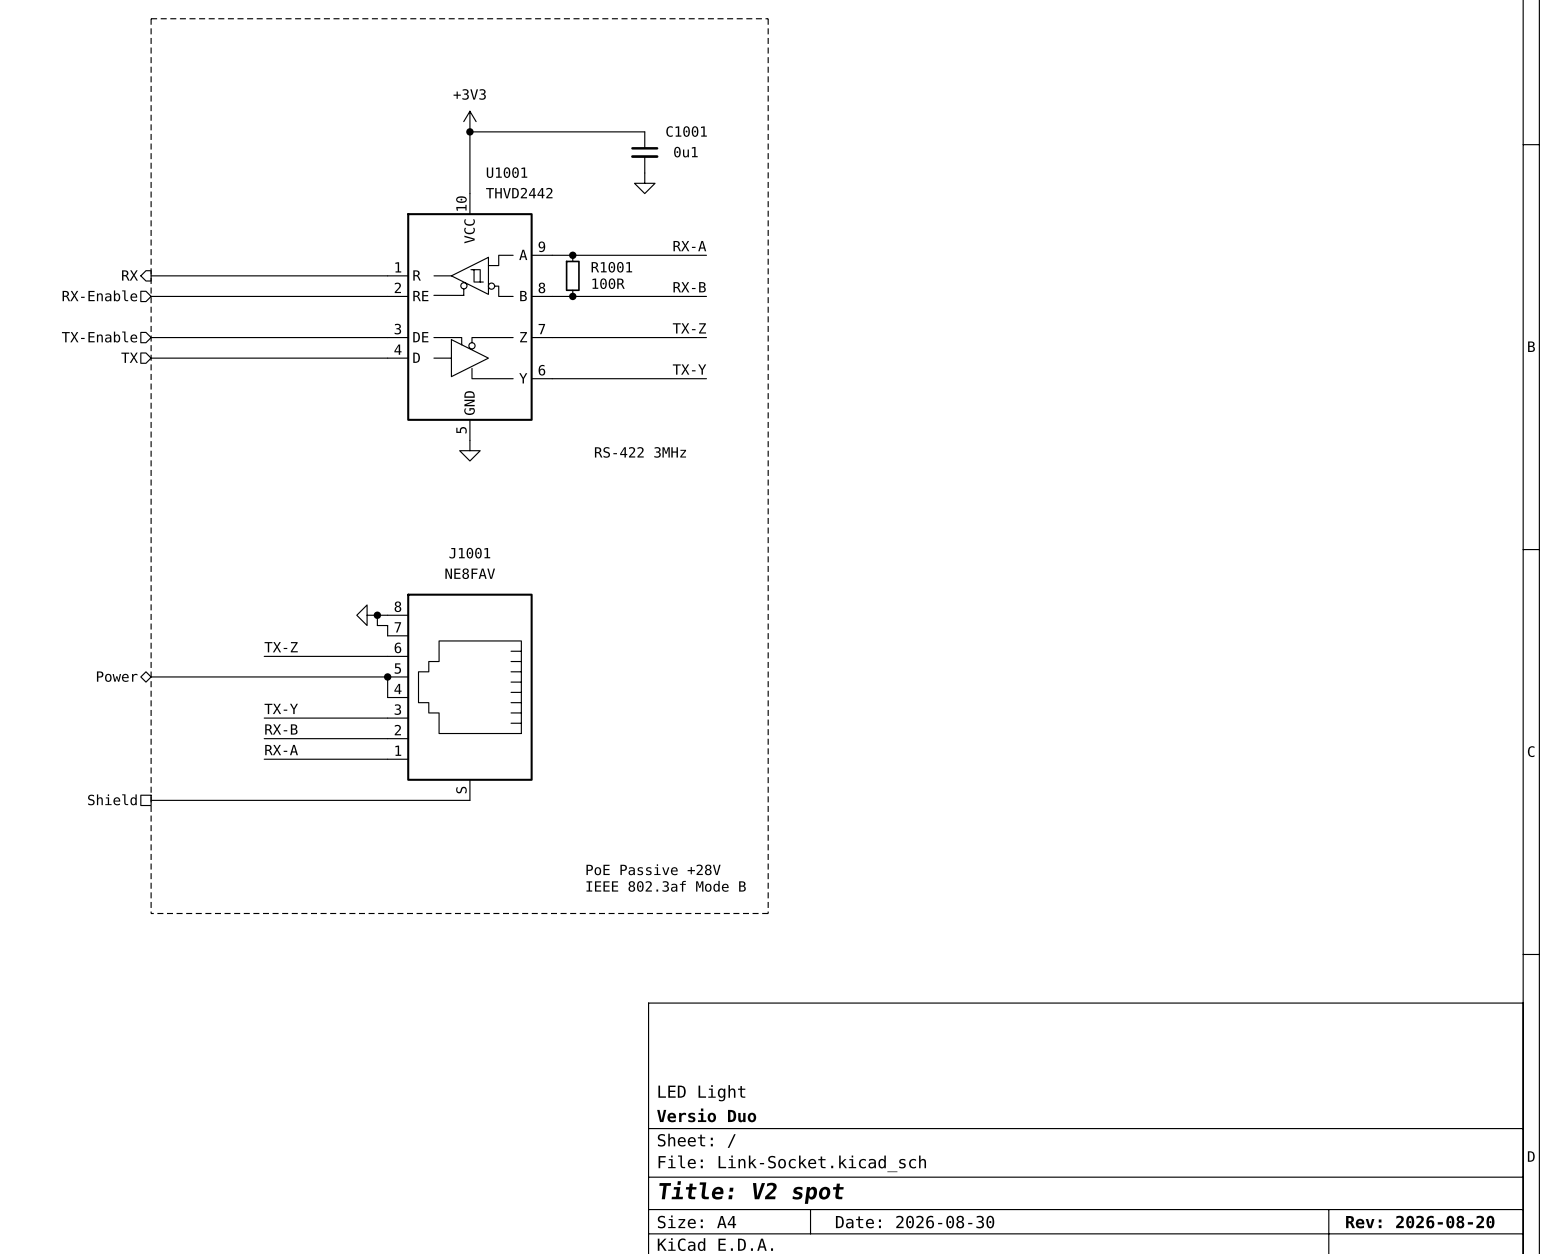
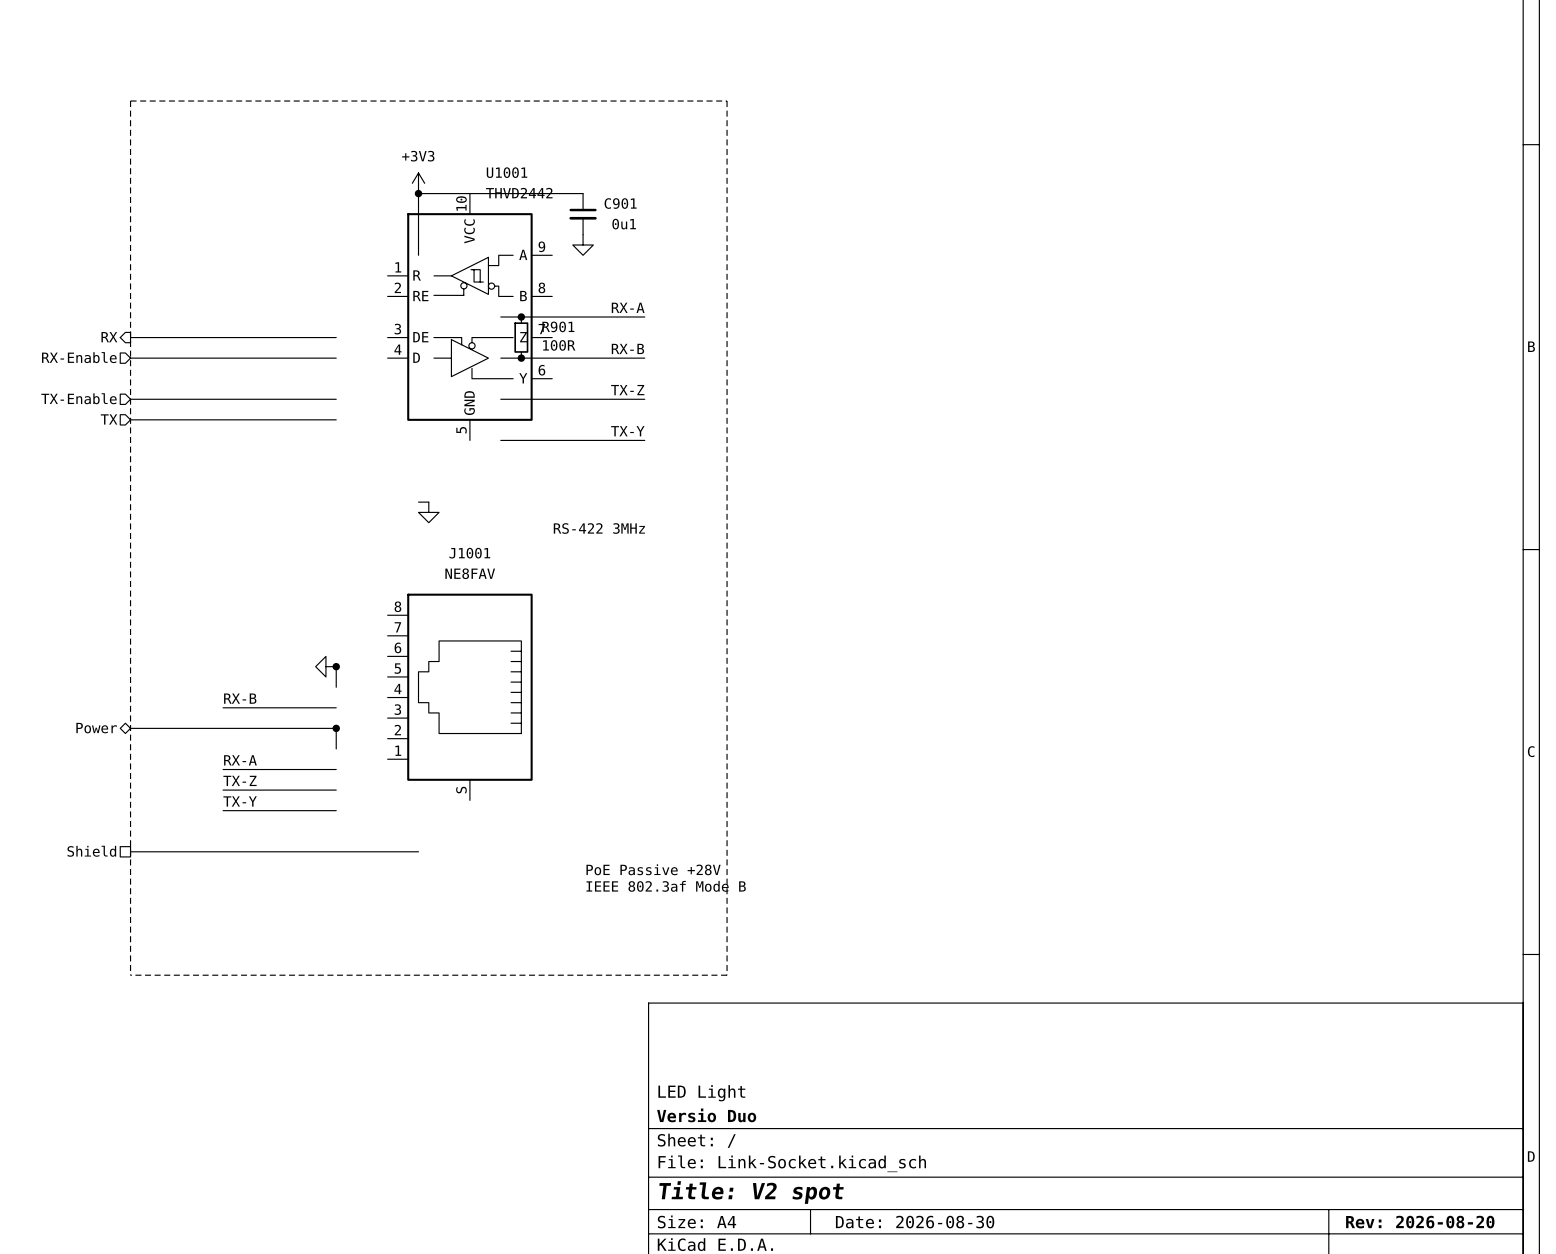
line: (151, 18) (151, 913) (768, 913) (768, 18) (151, 18) -> (130, 101) (130, 975) (727, 975) (727, 101) (130, 101)
power symbol position: +3V3 (469, 121) -> +3V3 (418, 183)
junction: (469, 131) -> none
wire: (644, 131) (469, 131) (469, 193) -> none
C1001: 0u1 (644, 152) -> none
power symbol position: (644, 183) -> (583, 245)
junction: none -> (418, 193)
wire: none -> (583, 193) (418, 193) (418, 255)
C901: none -> 0u1 (583, 214)
label position: RX-A (689, 246) -> RX-A (628, 307)
wire: (552, 255) (706, 255) -> none
junction: (572, 255) -> none
hierarchical label position: RX (129, 275) -> RX (109, 337)
wire: (151, 275) (387, 275) -> none
R1001: 100R (572, 275) -> none
label position: RX-B (689, 287) -> RX-B (627, 348)
hierarchical label position: RX-Enable (99, 295) -> RX-Enable (79, 357)
wire: (151, 296) (387, 296) -> none
wire: (552, 296) (706, 296) -> none
junction: (572, 296) -> none
wire: none -> (500, 316) (644, 316)
junction: none -> (521, 316)
label position: TX-Z (689, 328) -> TX-Z (627, 390)
hierarchical label position: TX-Enable (99, 337) -> TX-Enable (79, 398)
wire: none -> (130, 337) (151, 337)
wire: (336, 337) (387, 337) -> none
R901: none -> 100R (521, 337)
wire: (552, 337) (706, 337) -> none
hierarchical label position: TX (129, 357) -> TX (109, 419)
wire: none -> (130, 358) (151, 358)
wire: (336, 358) (387, 358) -> none
wire: none -> (500, 358) (644, 358)
junction: none -> (521, 358)
label position: TX-Y (689, 369) -> TX-Y (627, 431)
wire: (552, 378) (706, 378) -> none
wire: none -> (130, 399) (336, 399)
wire: none -> (500, 399) (644, 399)
wire: none -> (130, 419) (336, 419)
wire: none -> (500, 440) (644, 440)
power symbol: (469, 450) -> none
text position: RS-422 3MHz (640, 452) -> RS-422 3MHz (599, 528)
wire: none -> (418, 502) (428, 502)
power symbol: none -> (428, 512)
power symbol: (367, 615) -> none
junction: (377, 615) -> none
wire: (387, 615) (377, 615) (377, 625) (387, 625) (387, 635) -> none
label position: TX-Z (281, 647) -> TX-Z (240, 780)
wire: (264, 656) (387, 656) -> none
power symbol: none -> (325, 666)
wire: none -> (336, 666) (336, 687)
junction: none -> (336, 666)
hierarchical label position: Power (117, 676) -> Power (96, 728)
wire: (151, 676) (387, 676) (387, 697) -> none
junction: (387, 676) -> none
wire: none -> (223, 707) (336, 707)
label position: TX-Y (281, 708) -> TX-Y (240, 801)
wire: (264, 718) (387, 718) -> none
wire: none -> (130, 728) (336, 728) (336, 748)
junction: none -> (336, 728)
label position: RX-B (281, 729) -> RX-B (240, 698)
wire: (264, 738) (387, 738) -> none
label position: RX-A (281, 750) -> RX-A (240, 760)
wire: (264, 759) (387, 759) -> none
wire: none -> (223, 769) (336, 769)
wire: none -> (223, 790) (336, 790)
hierarchical label position: Shield (112, 799) -> Shield (91, 851)
wire: (151, 800) (469, 800) -> none
wire: none -> (223, 810) (336, 810)
wire: none -> (130, 851) (418, 851)

